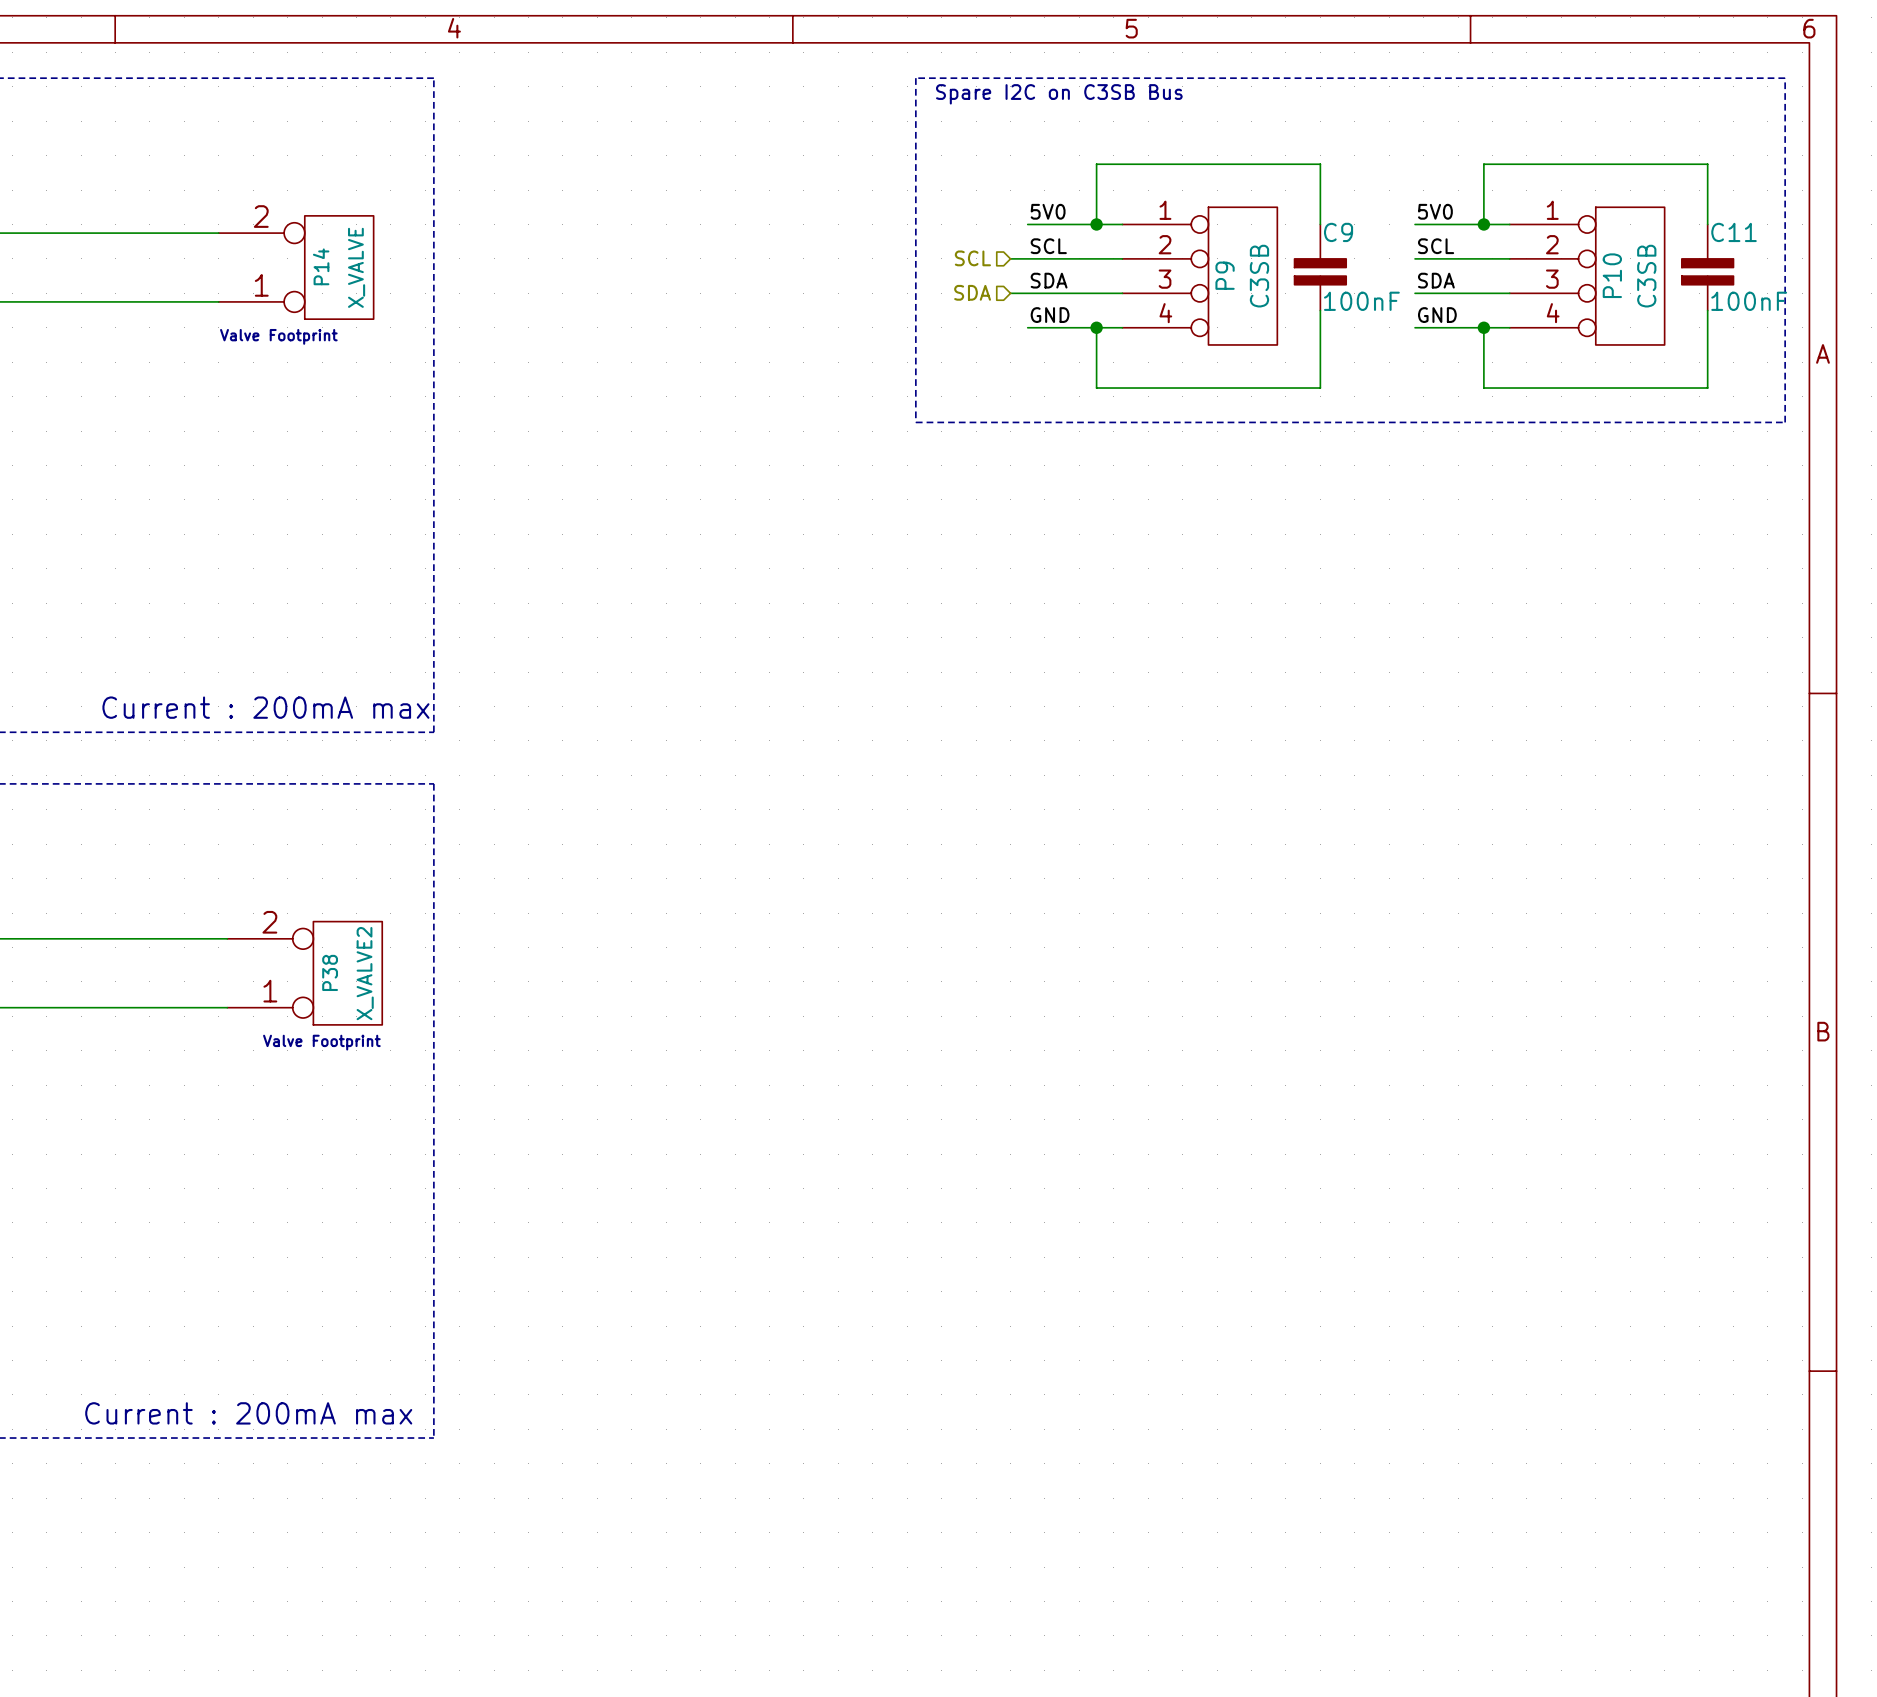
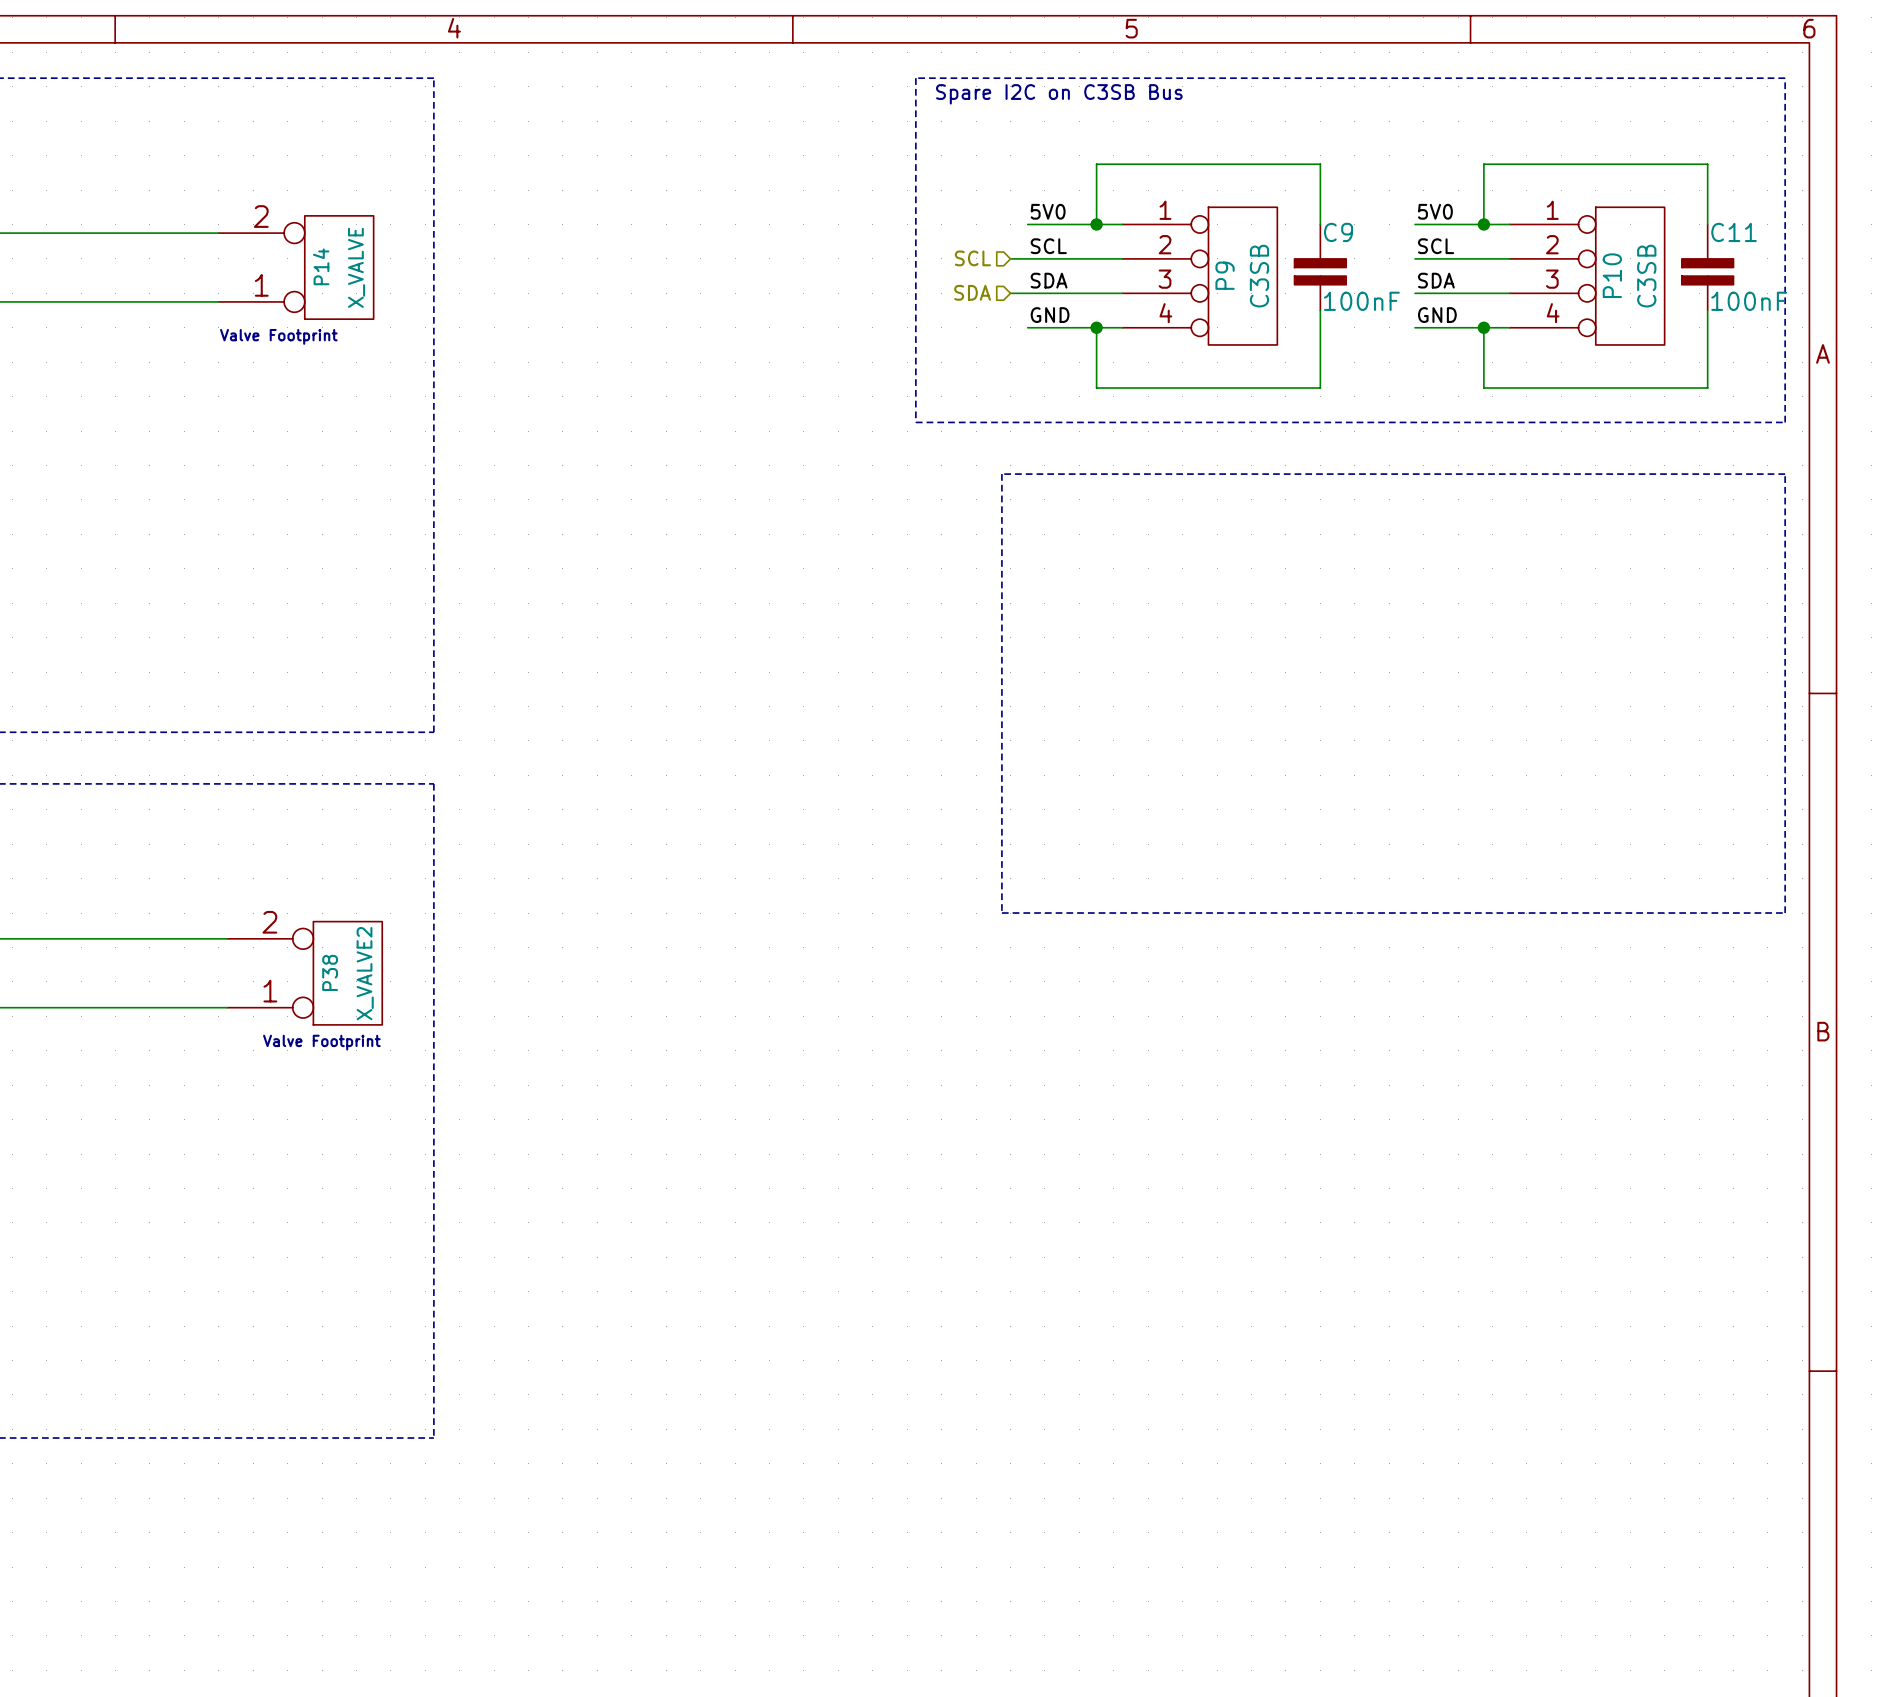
line: none -> (1001, 474) (1785, 474) (1785, 913) (1001, 913) (1001, 474)
text: Current : 200mA max (265, 707) -> none
text: Current : 200mA max (248, 1413) -> none

